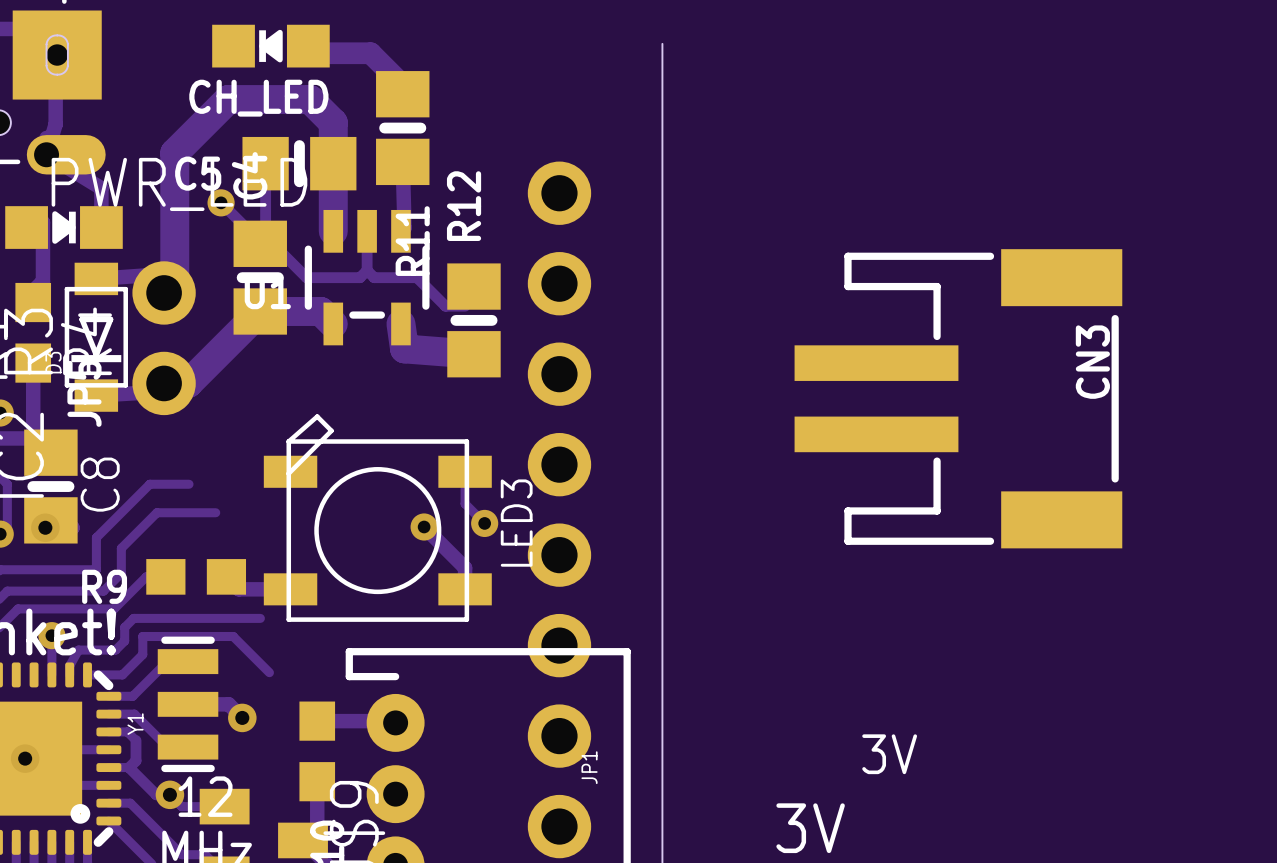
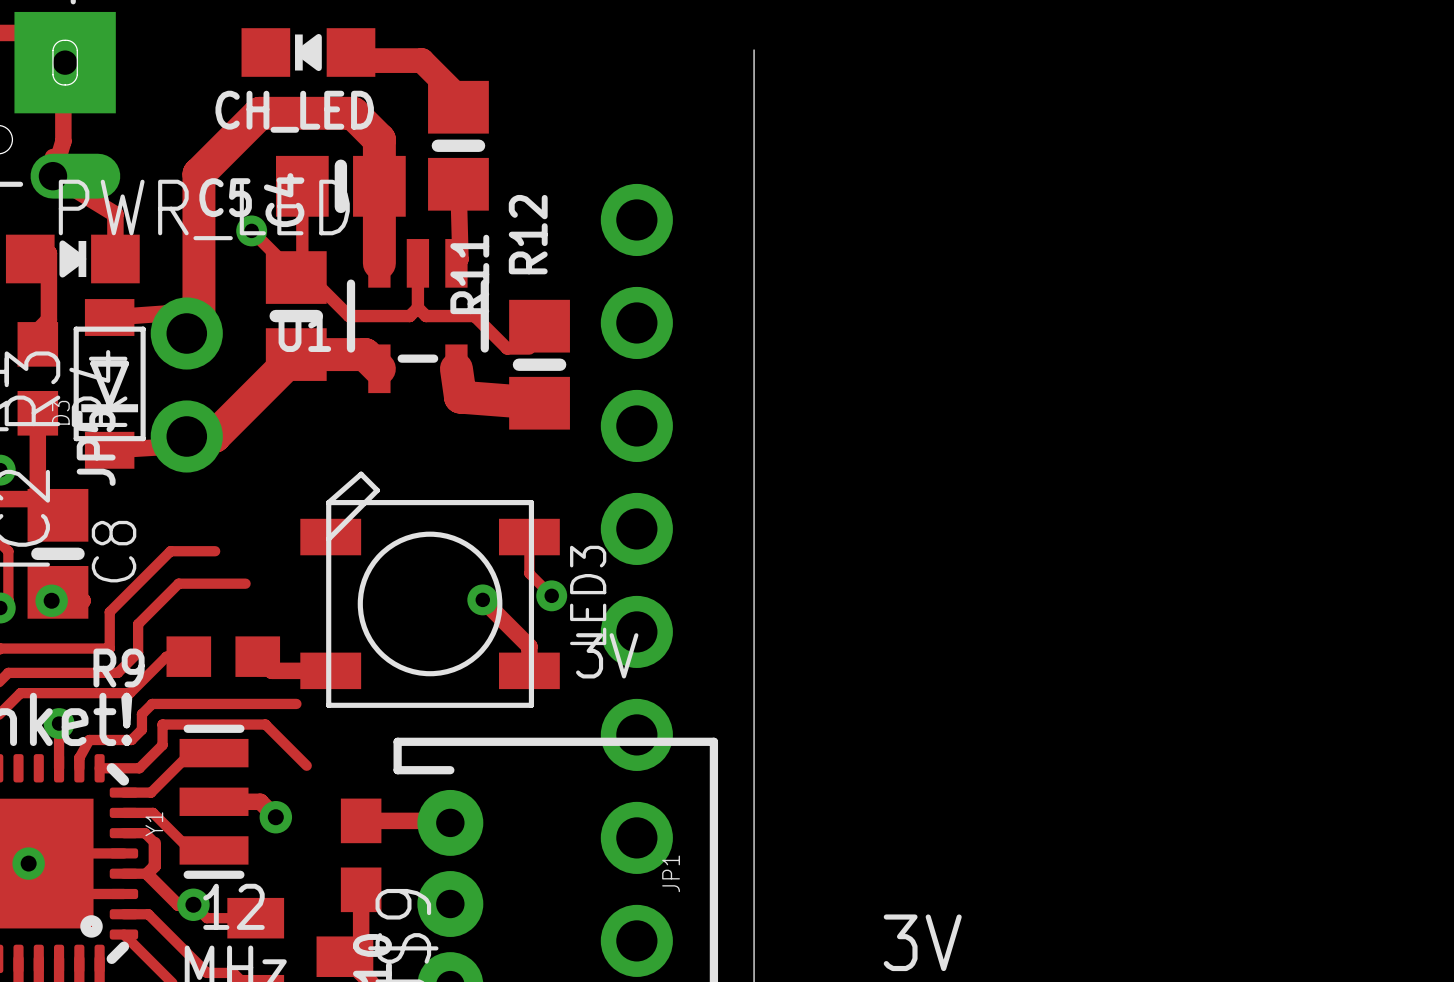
CN3: (958, 398) -> none
text position: 3V (889, 754) -> 3V (607, 655)

